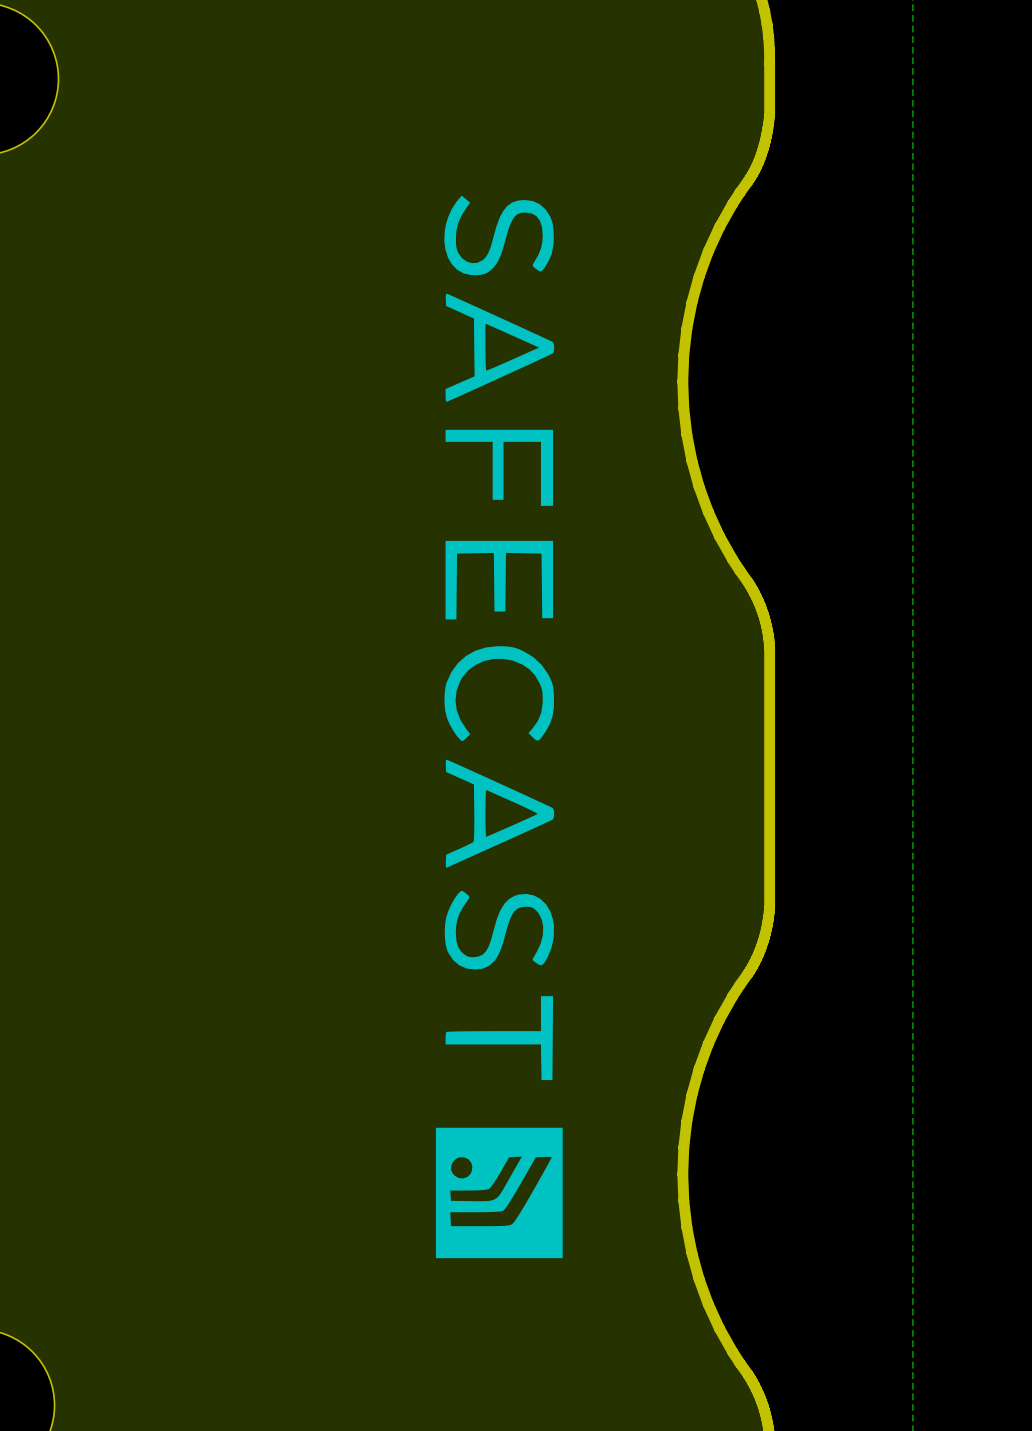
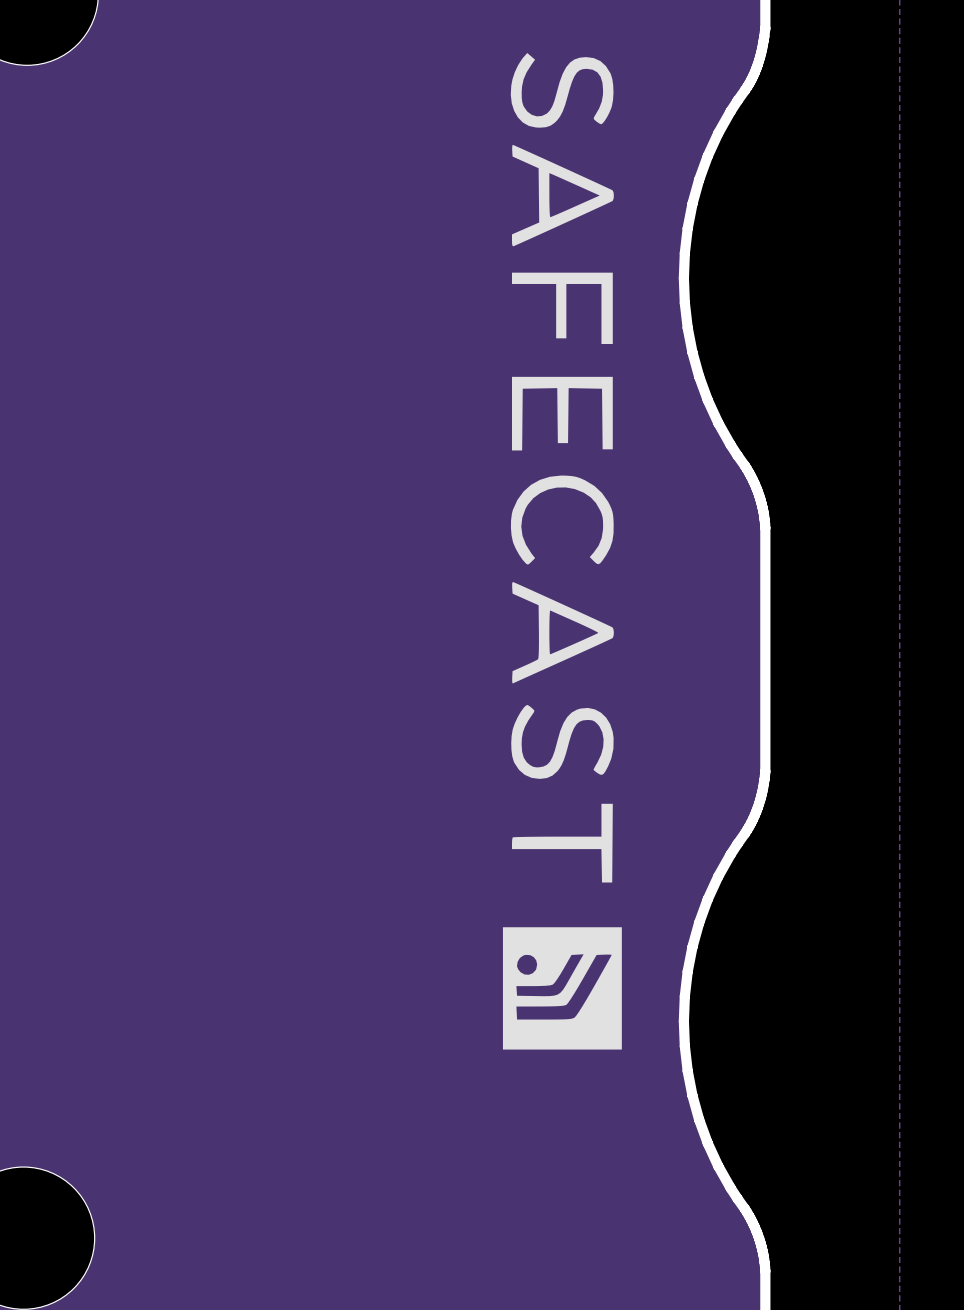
drawing position: (499, 726) -> (562, 551)

